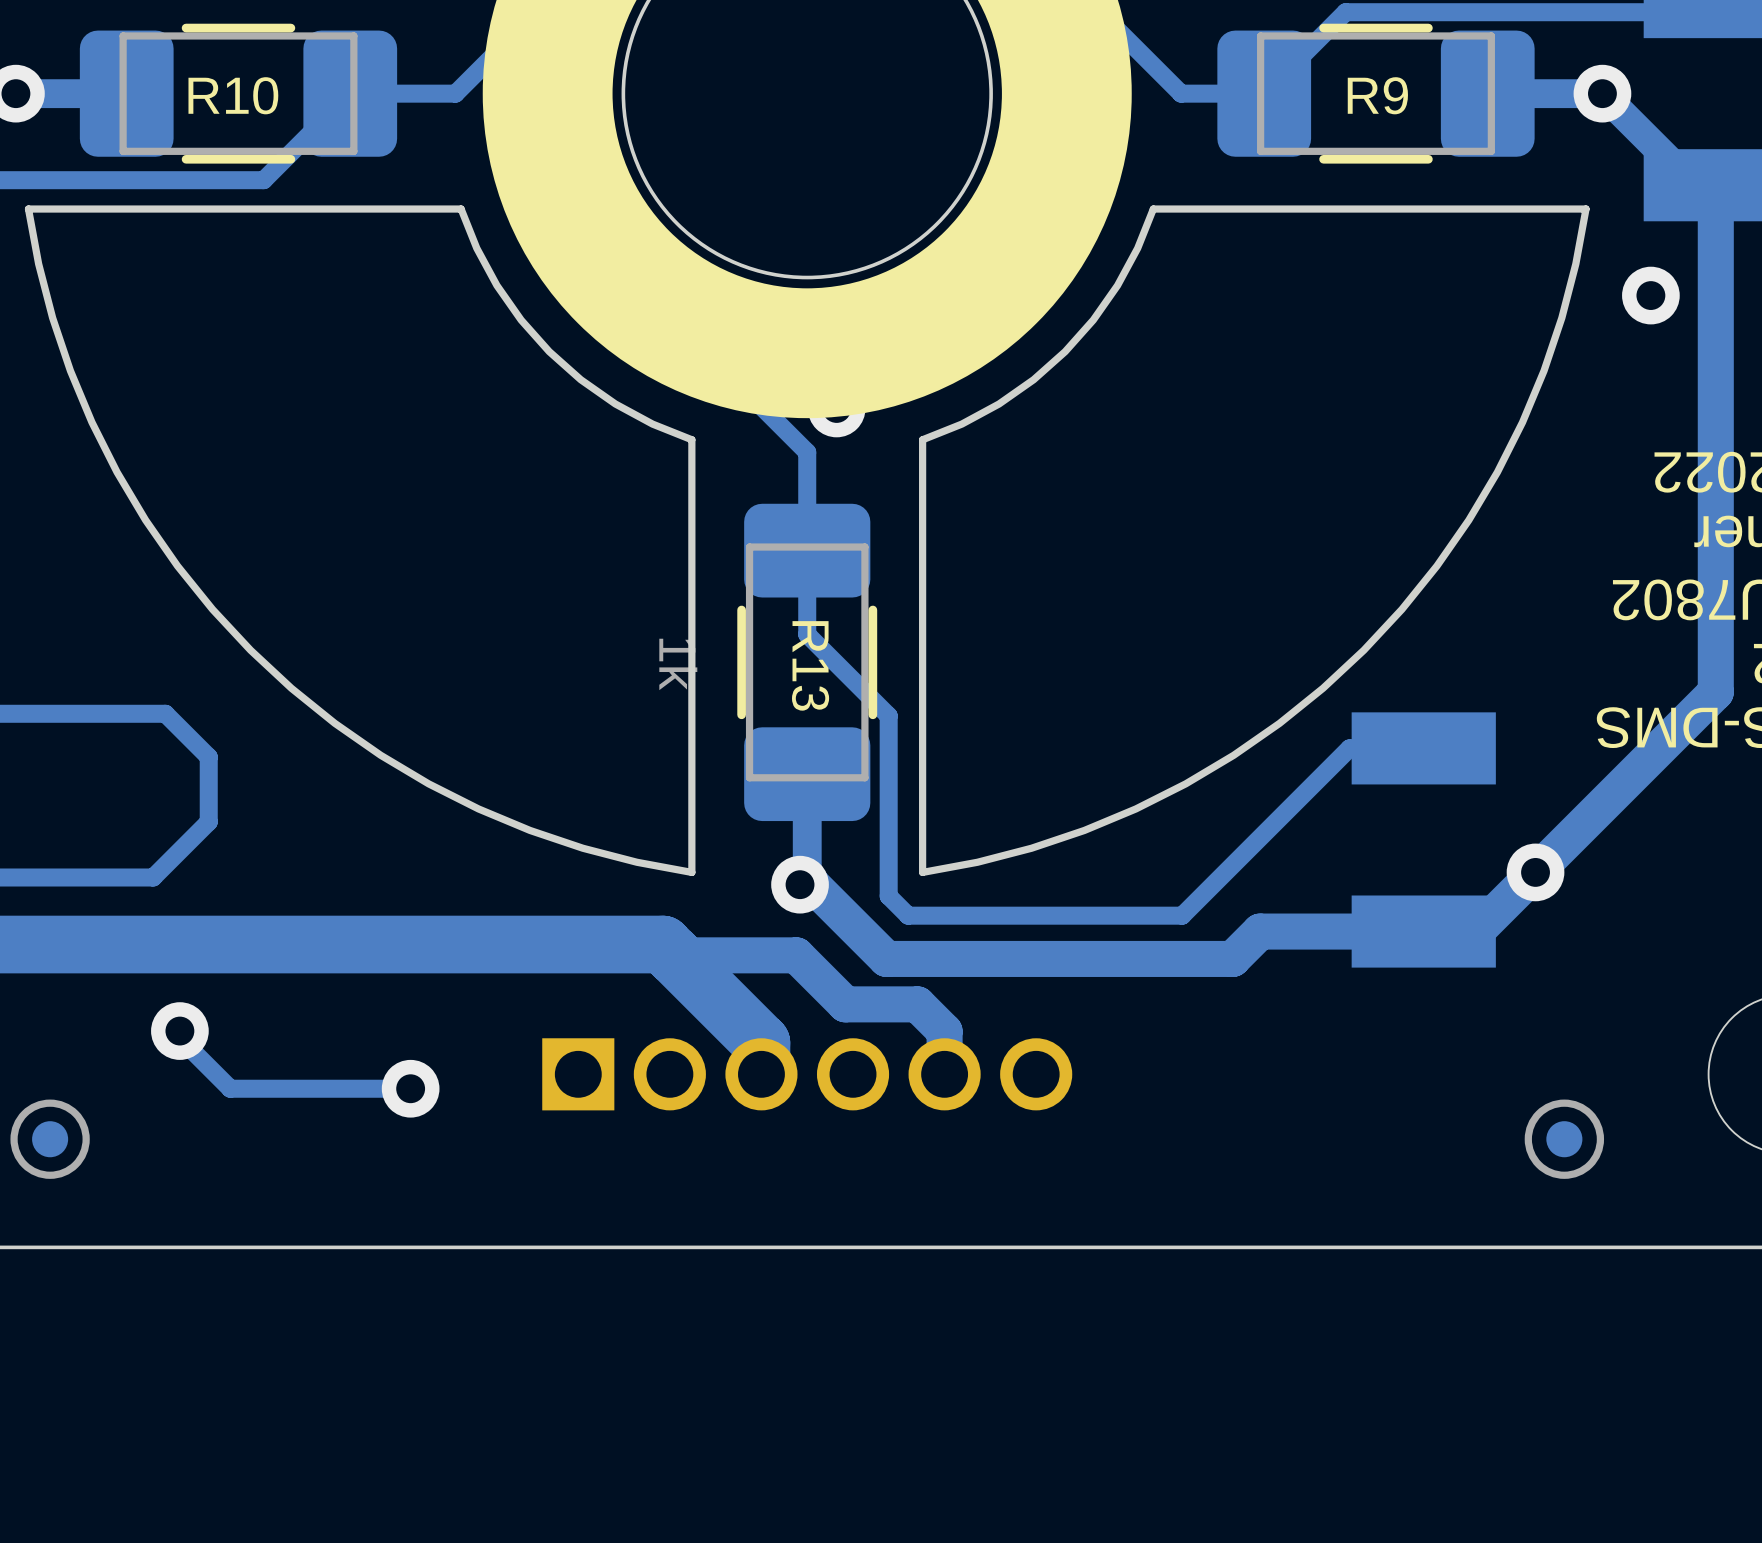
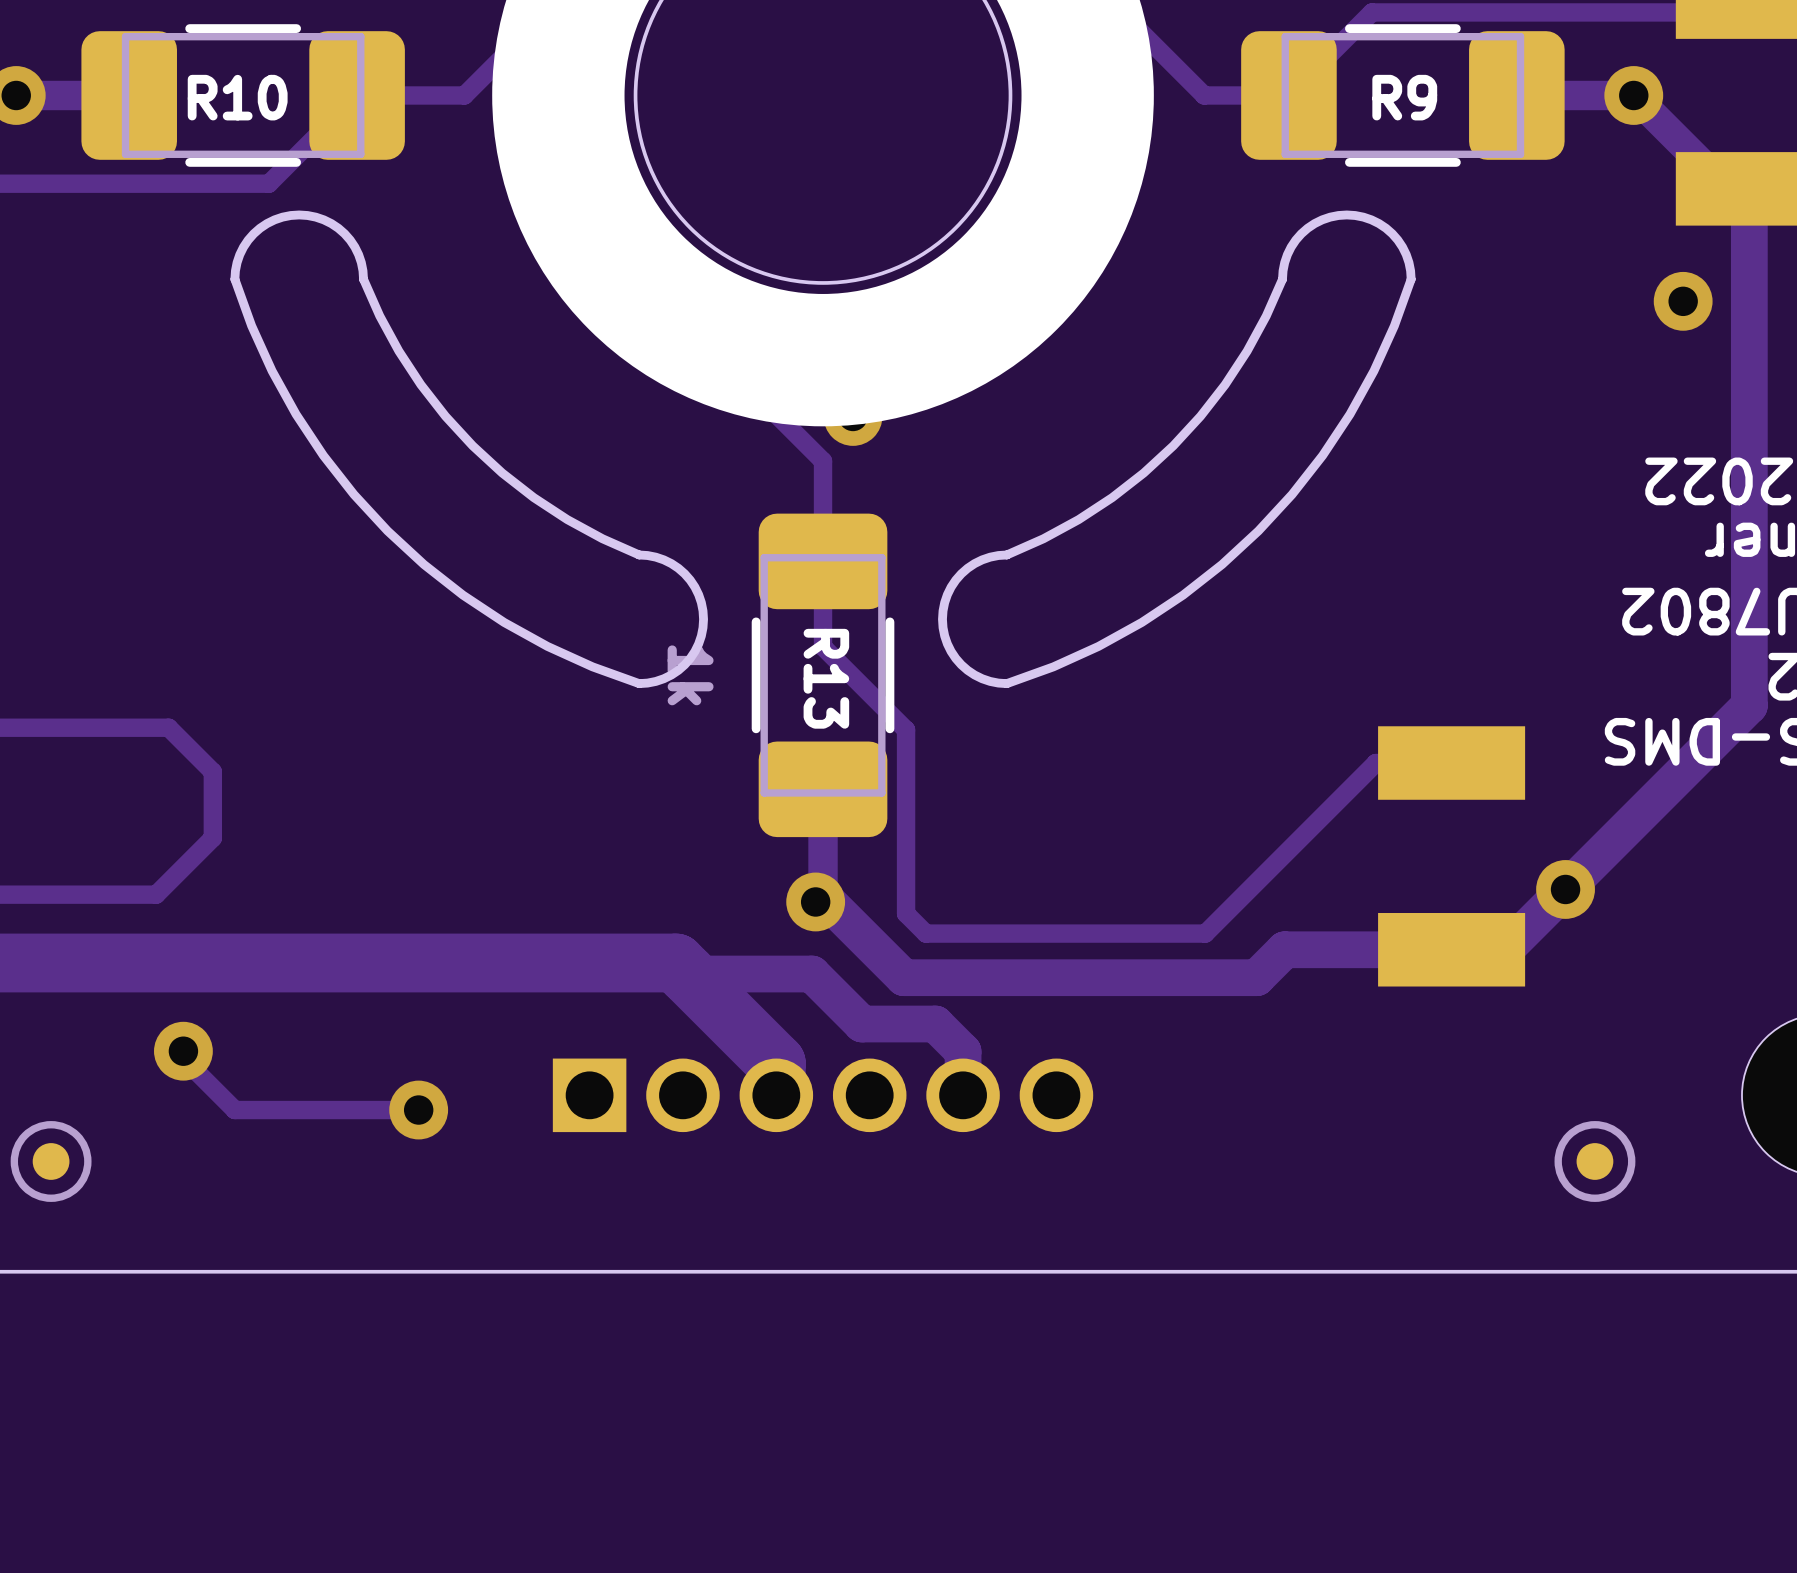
drawing: none -> [230, 210, 708, 689]
drawing: none -> [938, 210, 1416, 689]
board edge: (461, 209) (28, 209) (38, 263) (52, 317) (70, 370) (91, 422) (117, 472) (145, 520) (177, 565) (212, 609) (250, 650) (291, 688) (334, 723) (380, 755) (428, 783) (478, 808) (530, 830) (582, 848) (636, 862) (691, 872) (691, 439) (652, 424) (615, 403) (580, 379) (549, 351) (521, 320) (496, 285) (476, 248) (461, 209) -> none
board edge: (1586, 209) (1153, 209) (1137, 248) (1117, 285) (1093, 320) (1065, 351) (1033, 379) (999, 403) (961, 424) (922, 439) (922, 872) (977, 862) (1031, 848) (1084, 830) (1135, 808) (1185, 783) (1233, 755) (1279, 723) (1323, 688) (1363, 650) (1401, 609) (1436, 565) (1468, 520) (1497, 472) (1522, 422) (1544, 370) (1561, 317) (1575, 263) (1586, 209) -> none

